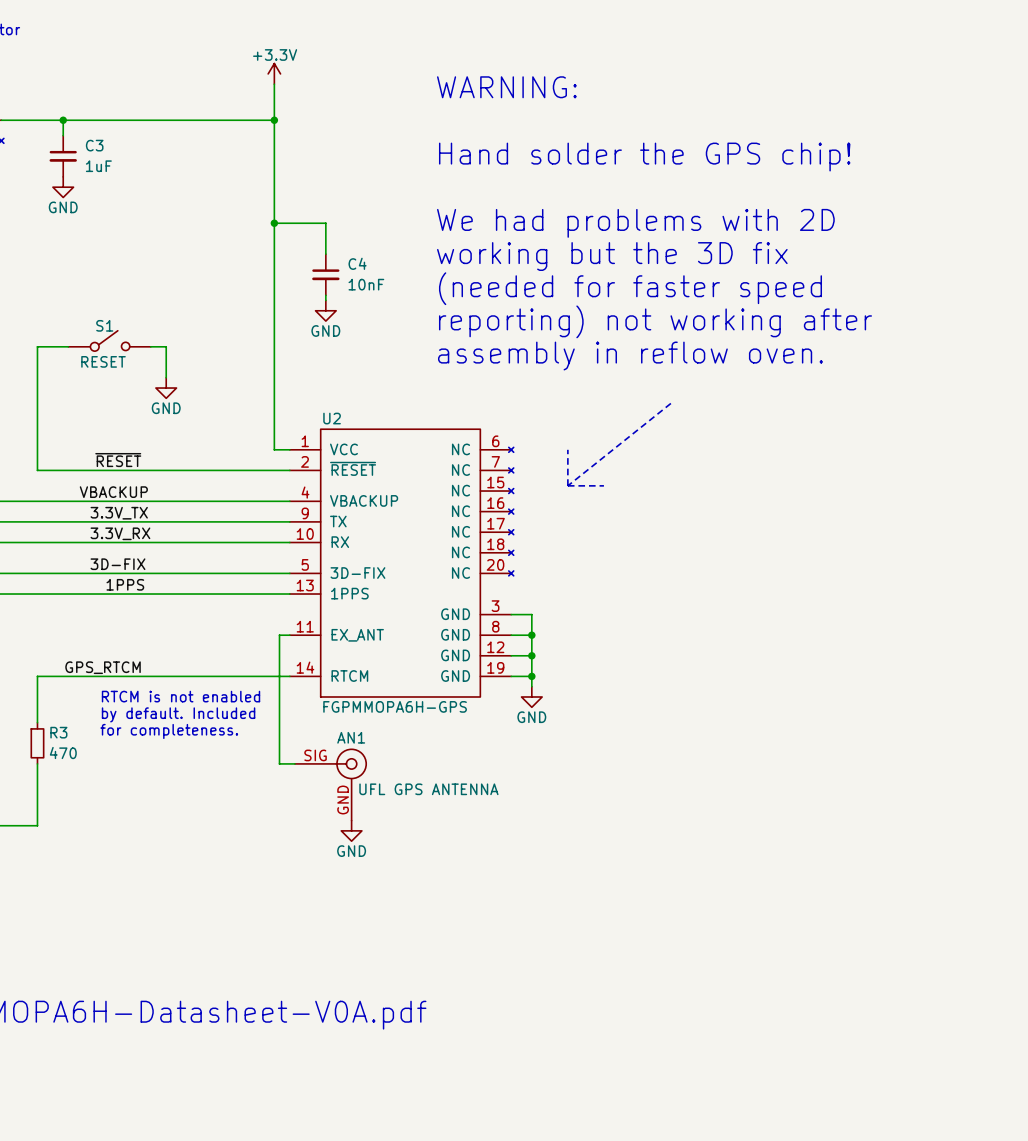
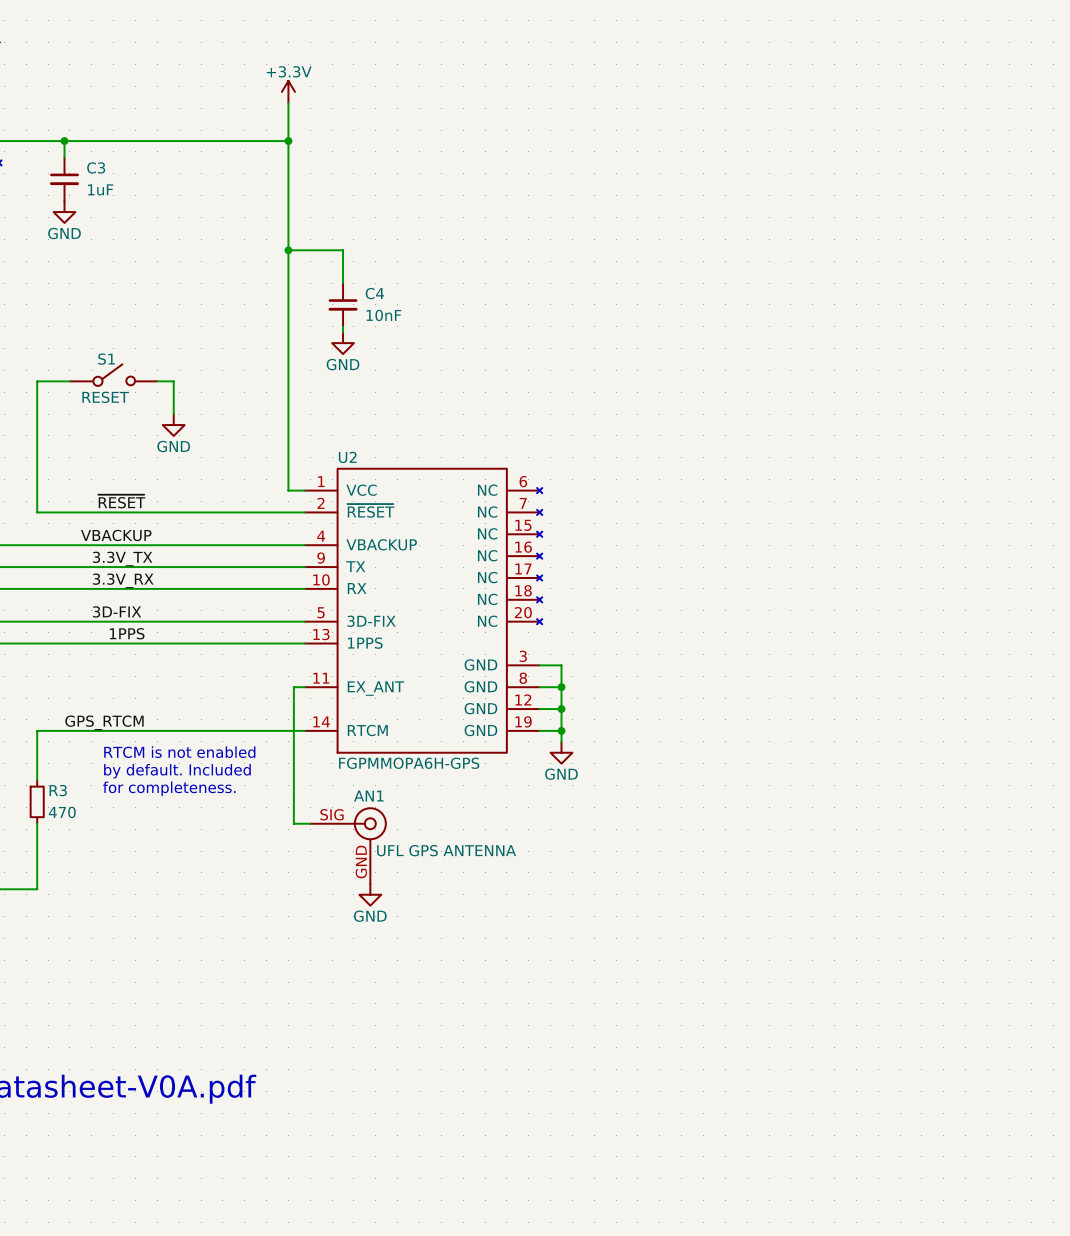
text: WARNING: (506, 87) -> none
text: Hand solder the GPS chip! (644, 157) -> none
text: We had problems with 2D (635, 223) -> none
text: working but the 3D fix (612, 256) -> none
text: (needed for faster speed (630, 288) -> none
text: reporting) not working after (655, 321) -> none
text: assembly in reflow oven. (630, 356) -> none
line: (670, 403) (567, 485) -> none
line: (567, 449) (567, 485) -> none
line: (567, 485) (603, 485) -> none

